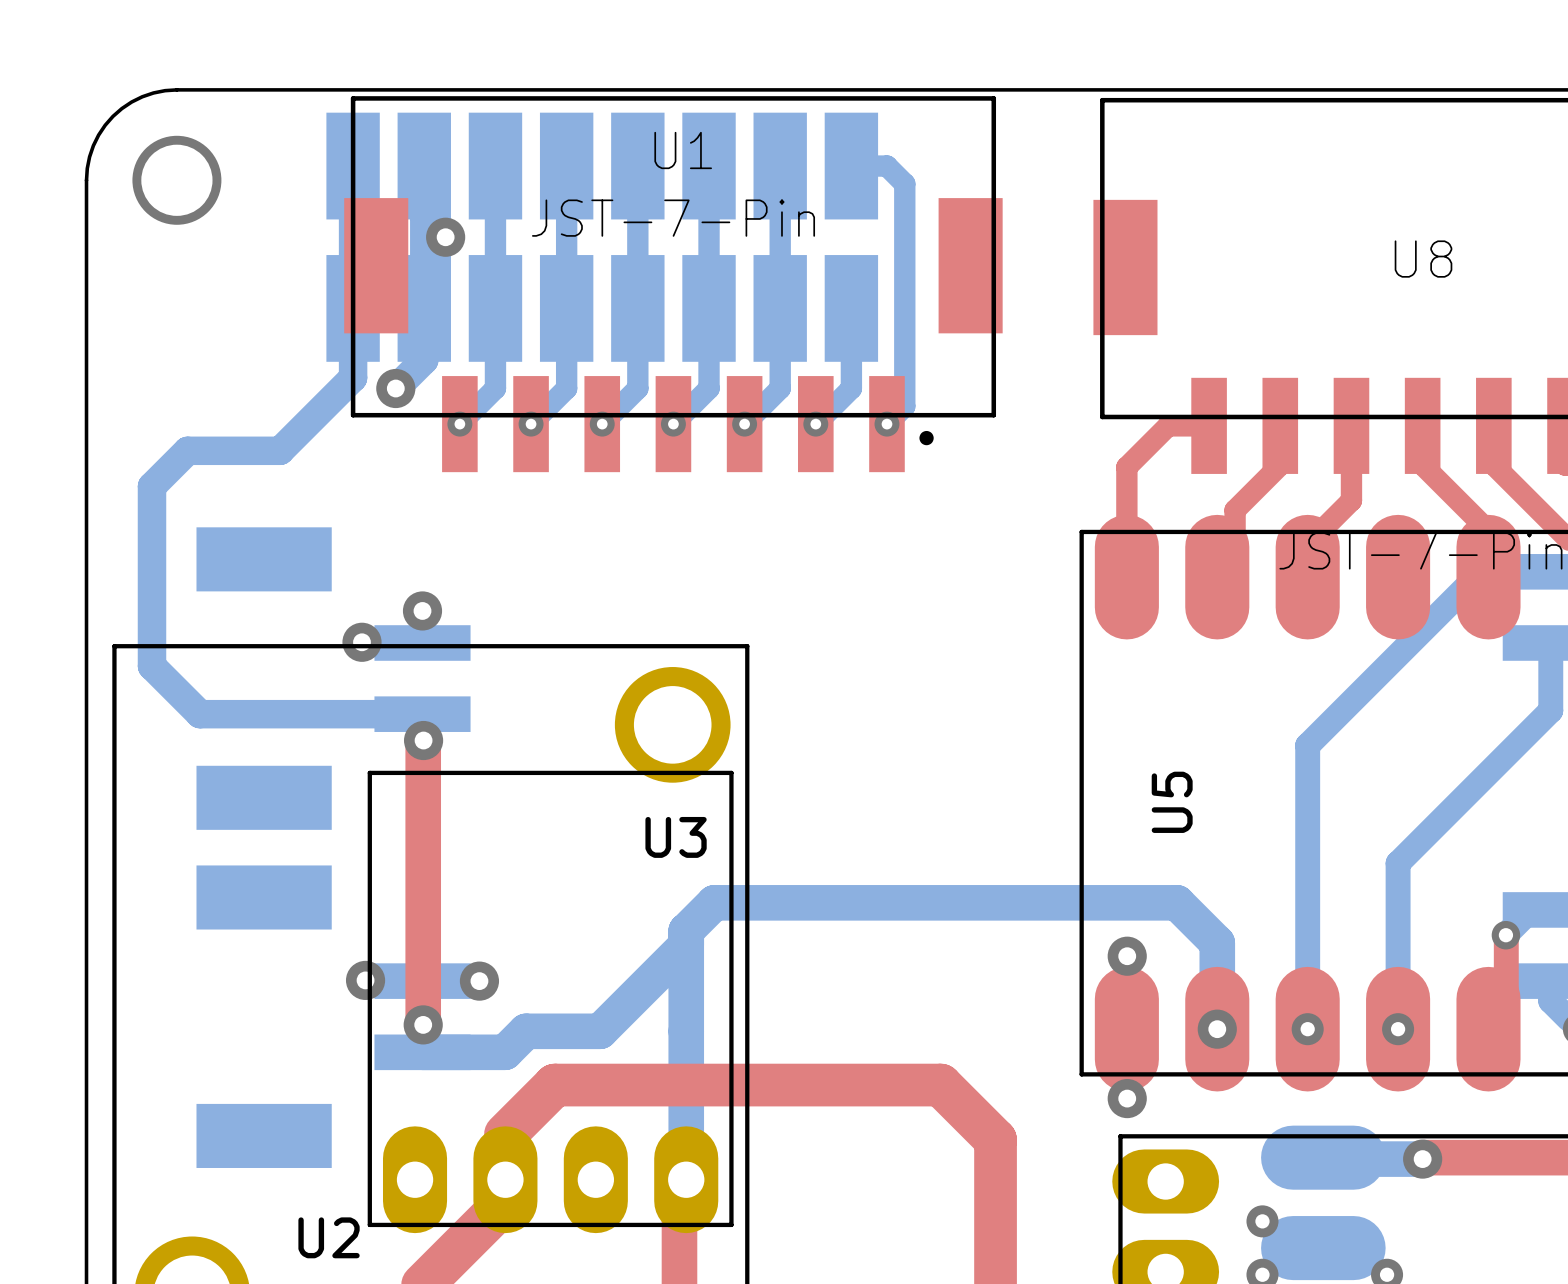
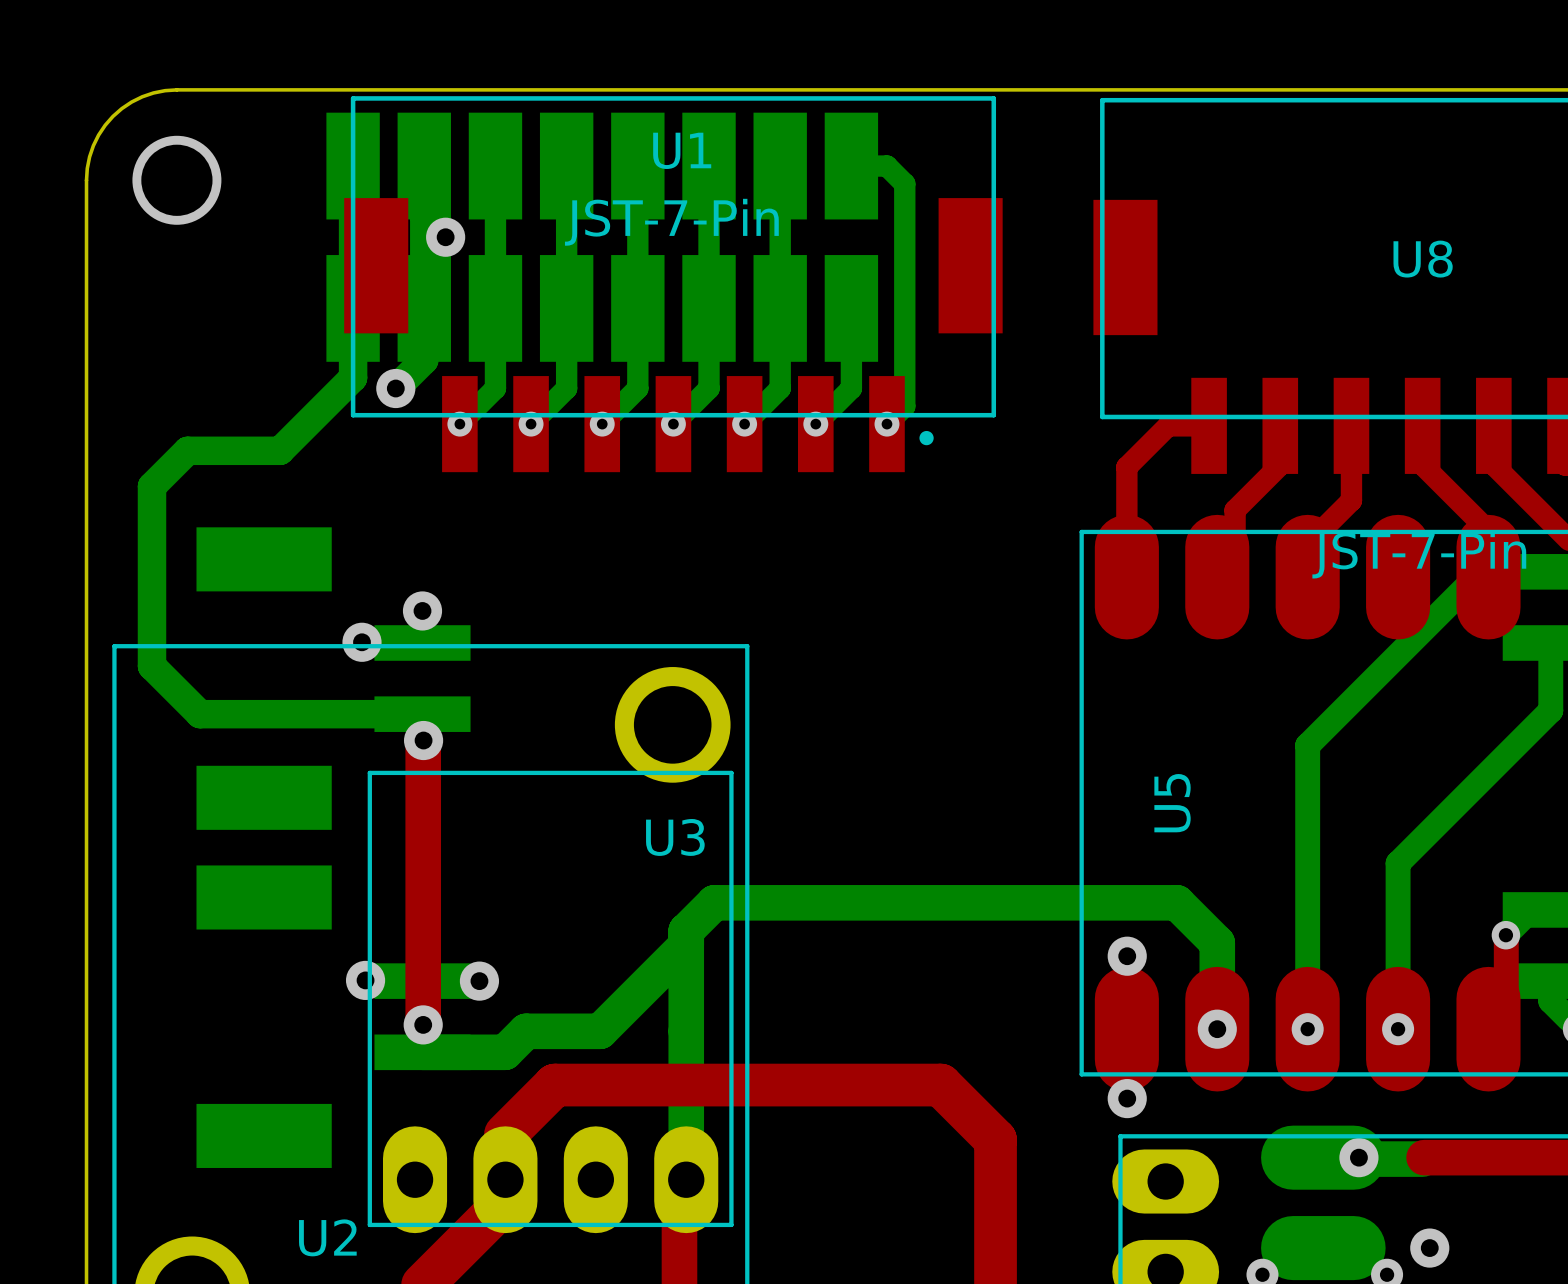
via: none -> (1358, 1157)
via: (1422, 1159) -> none
via: (1262, 1221) -> none
via: none -> (1429, 1248)

